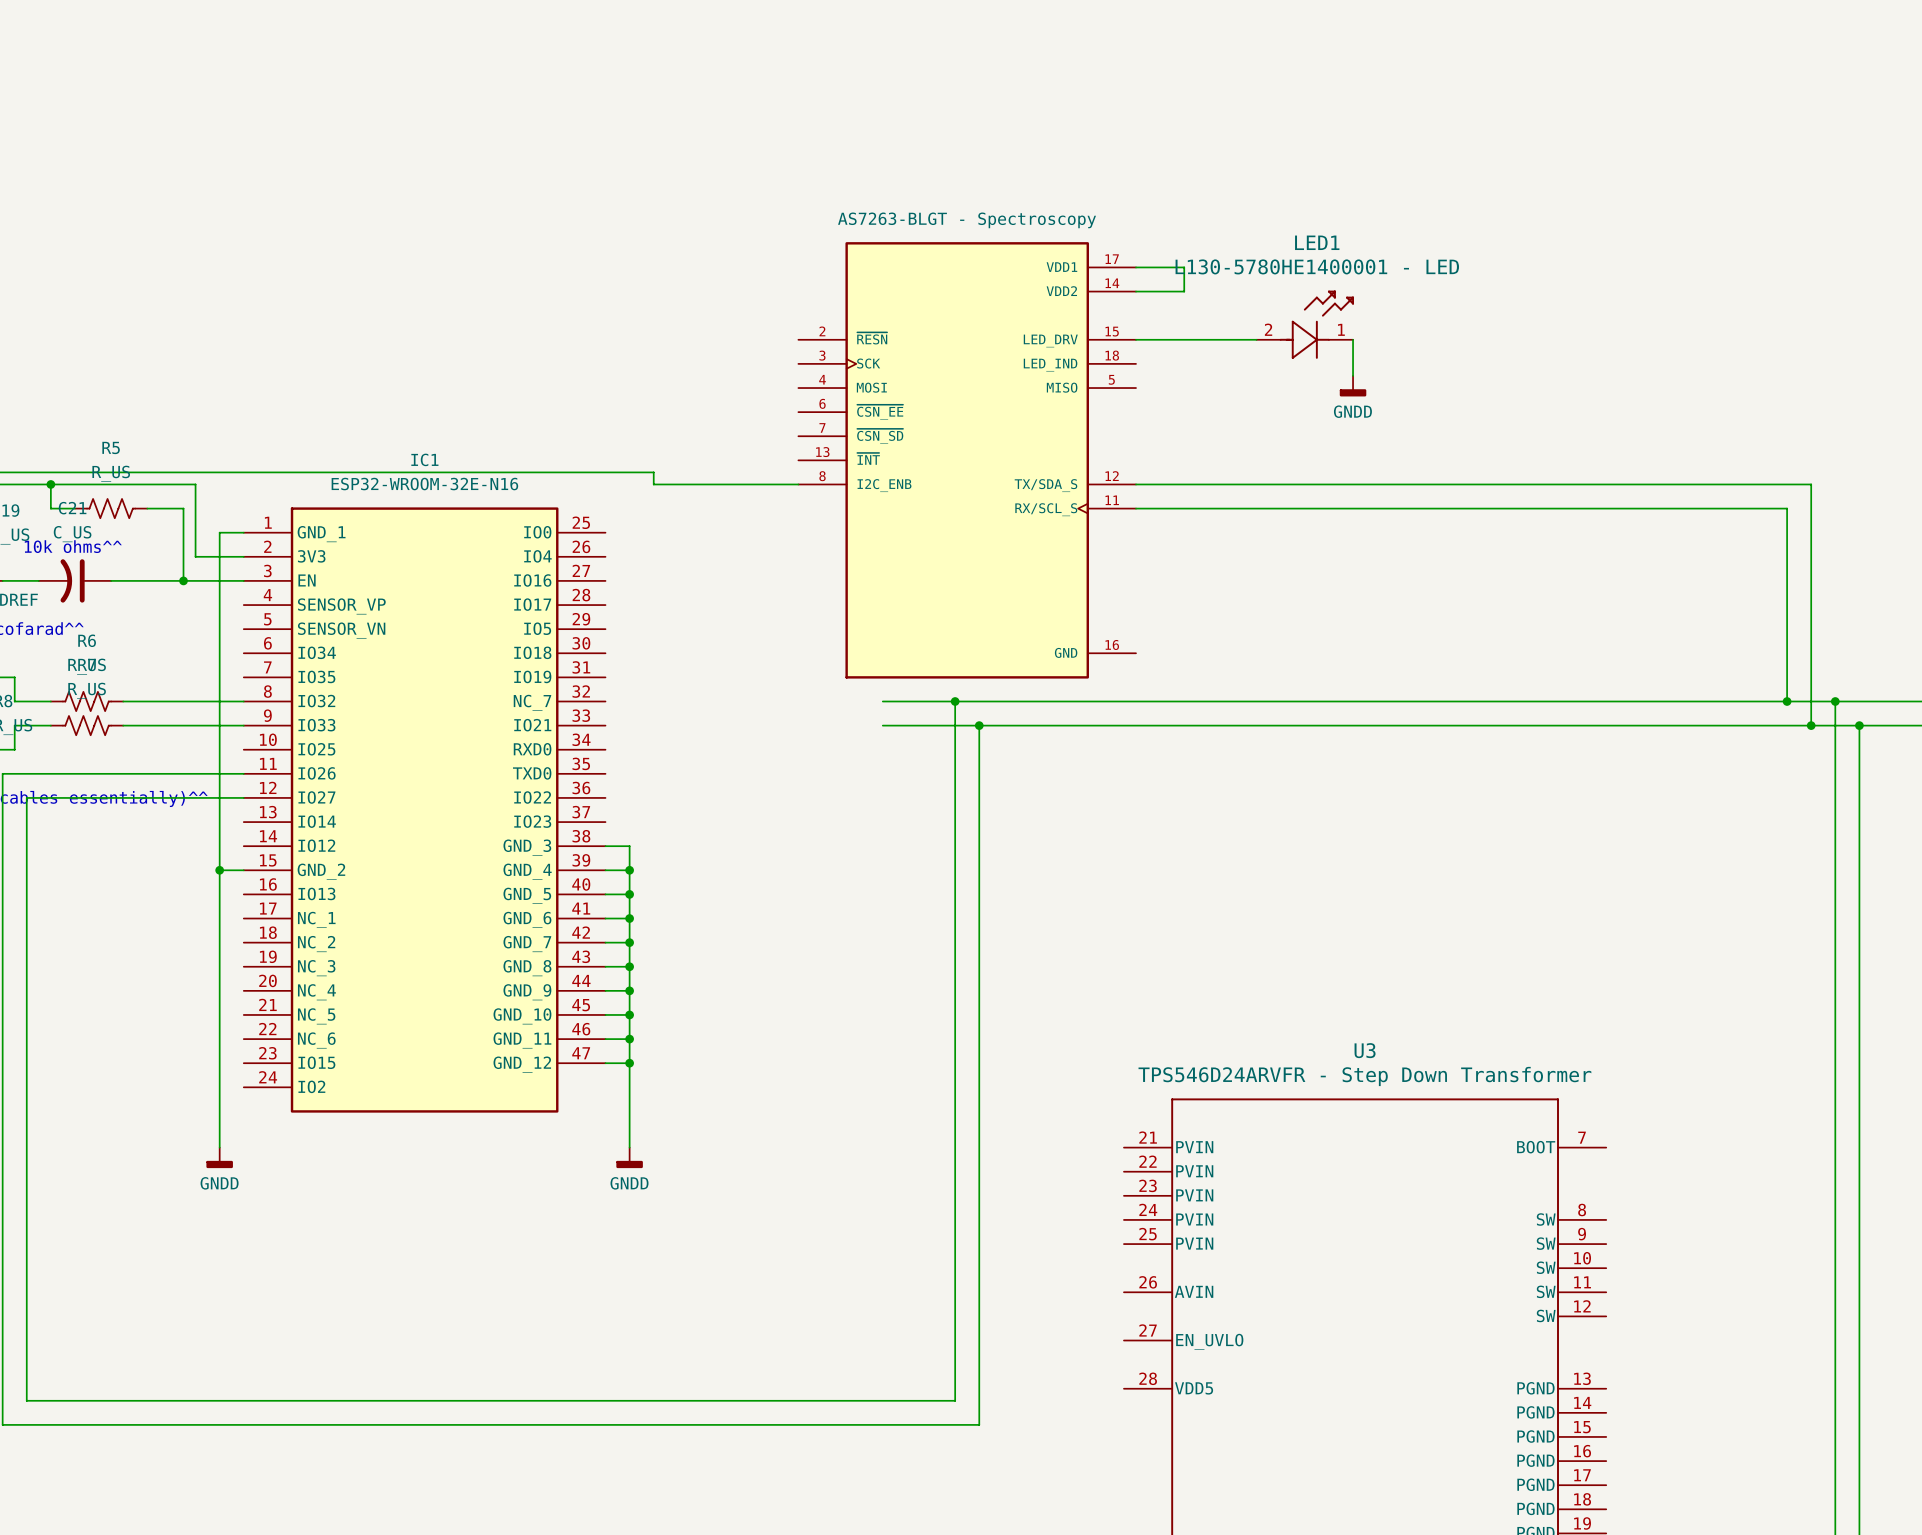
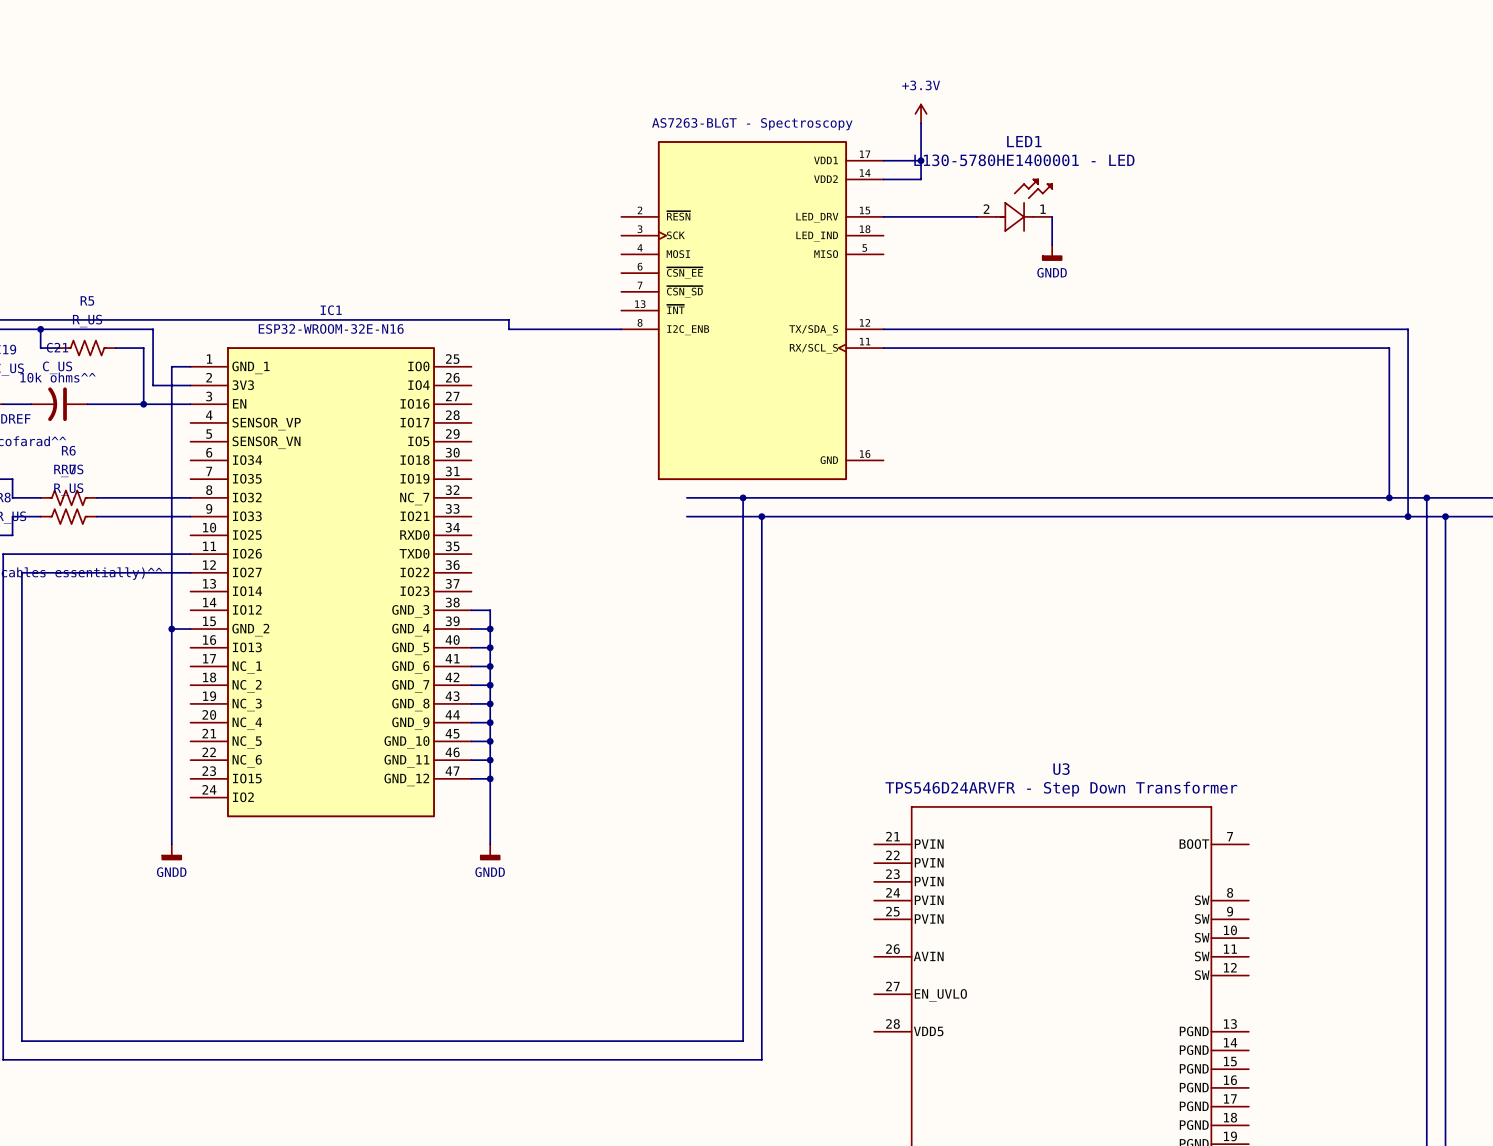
power symbol: none -> +3.3V (921, 113)
wire: none -> (921, 123) (921, 160)
junction: none -> (921, 160)

